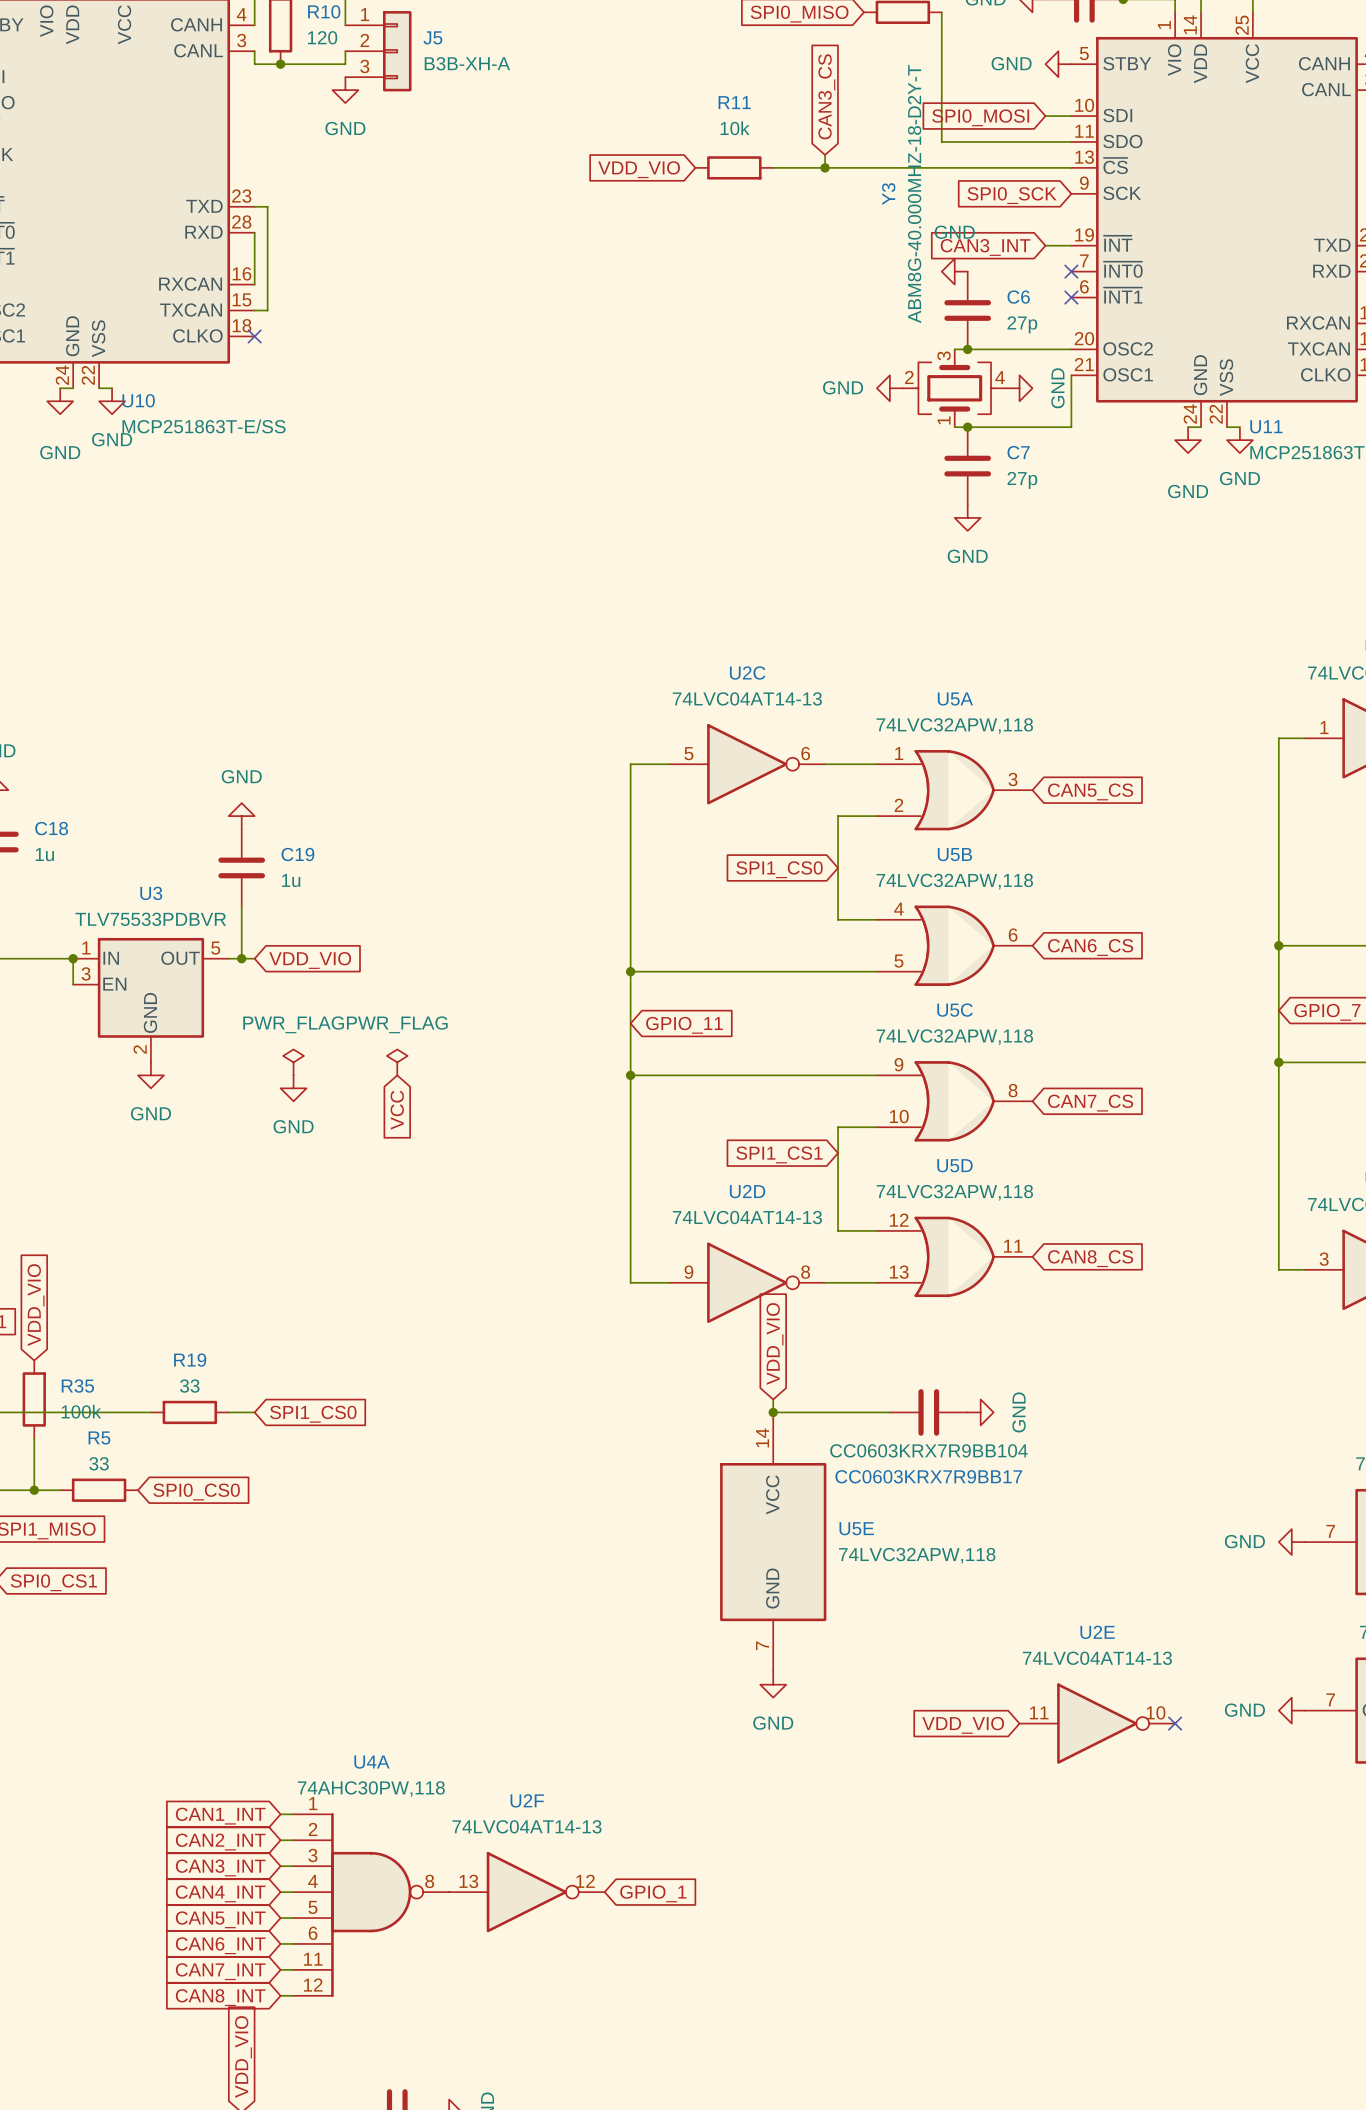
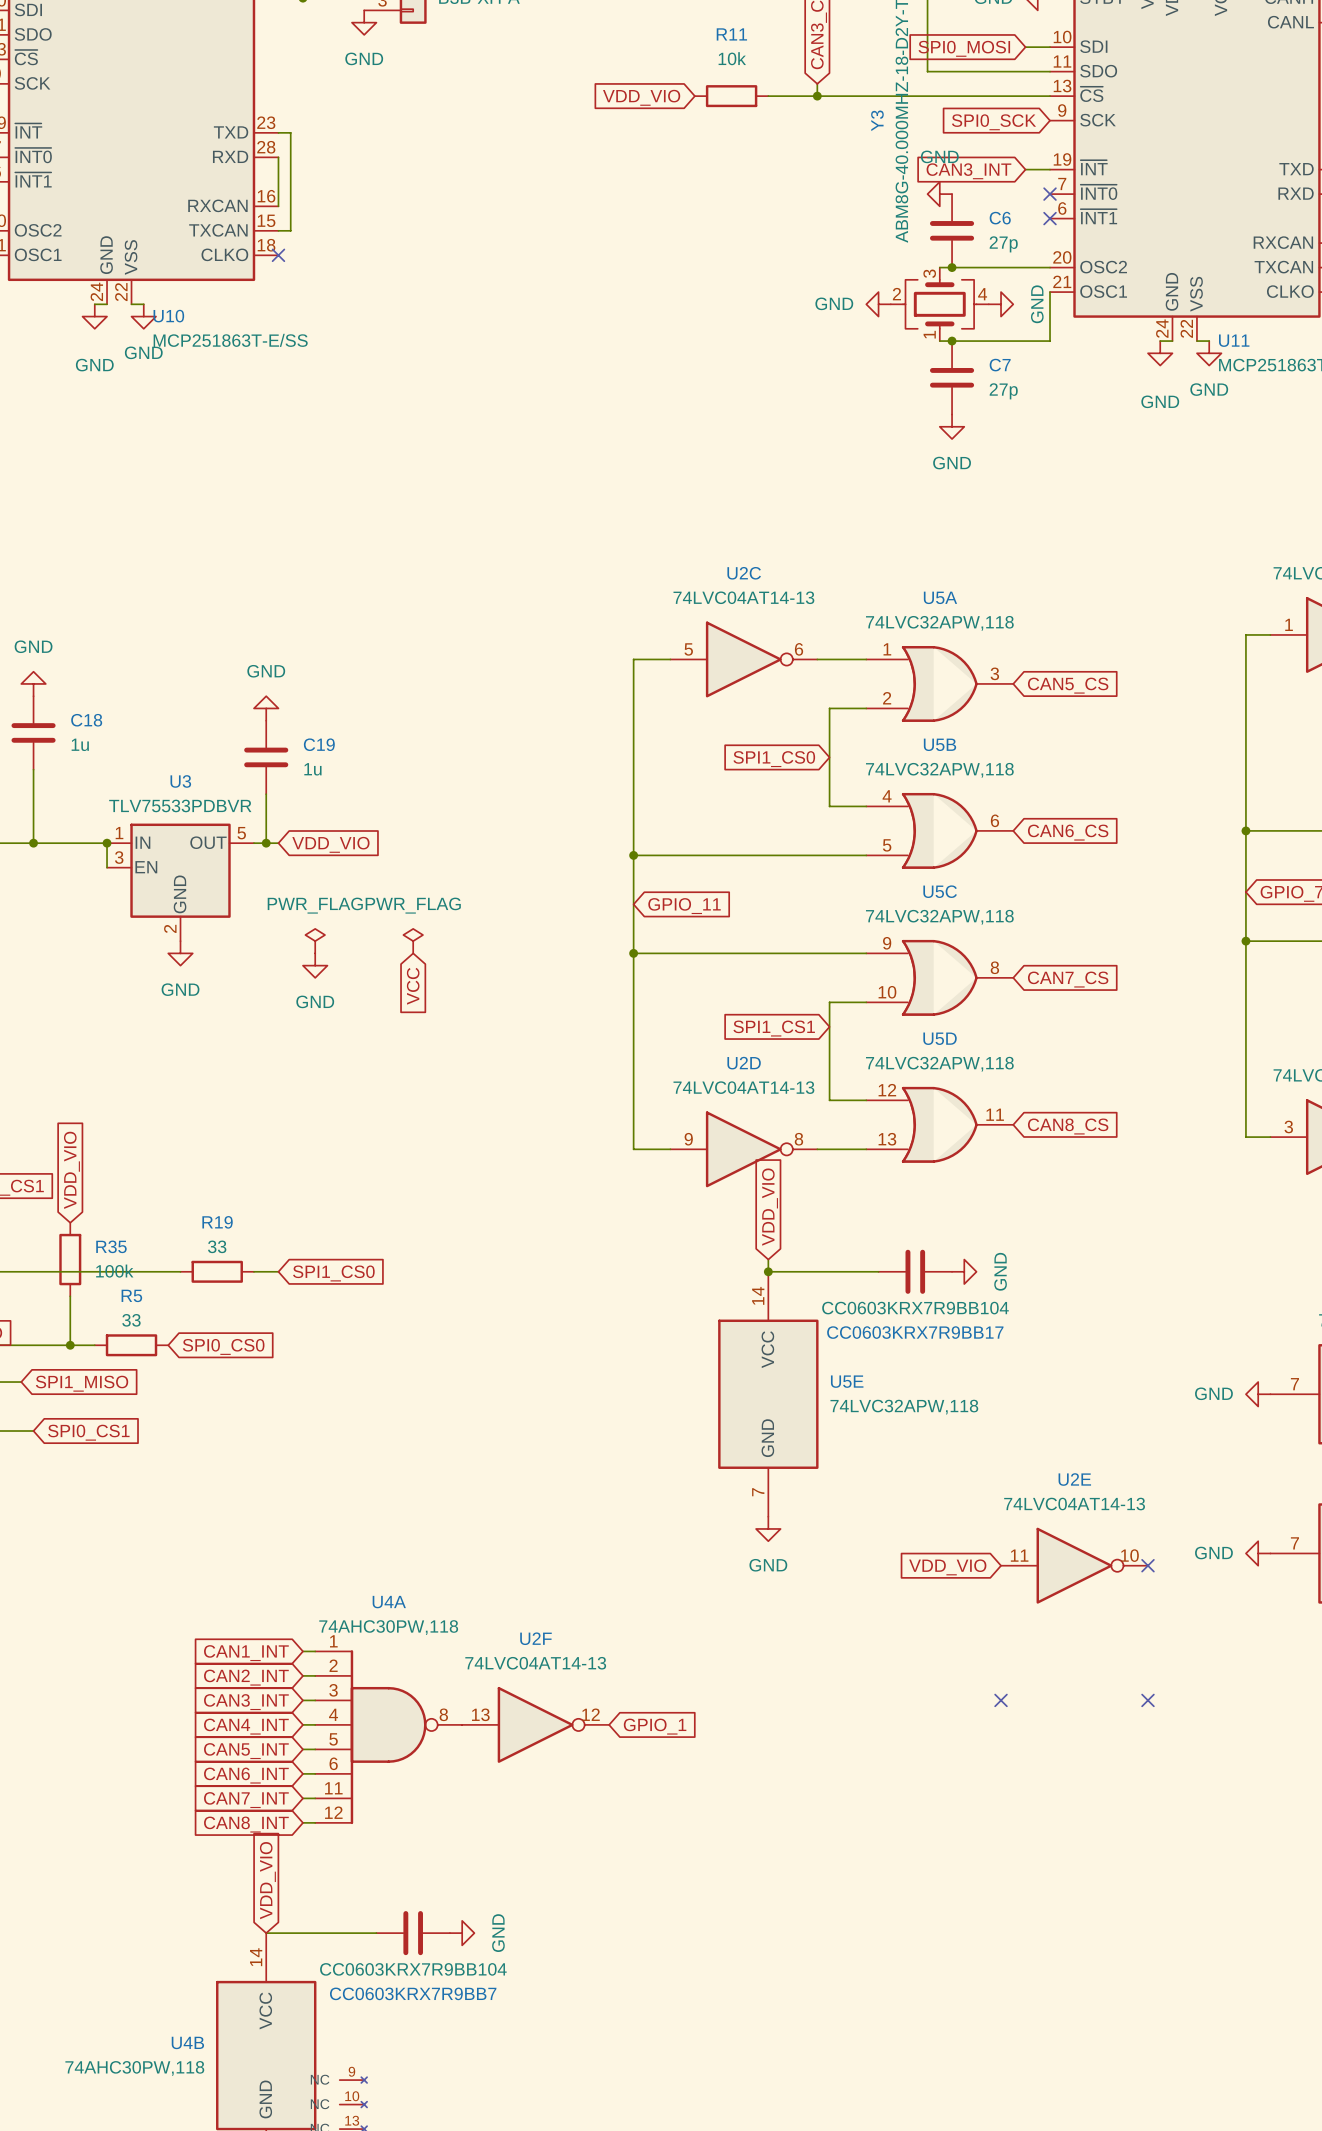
no-connect mark: none -> (1001, 1700)
no-connect mark: none -> (1147, 1700)

